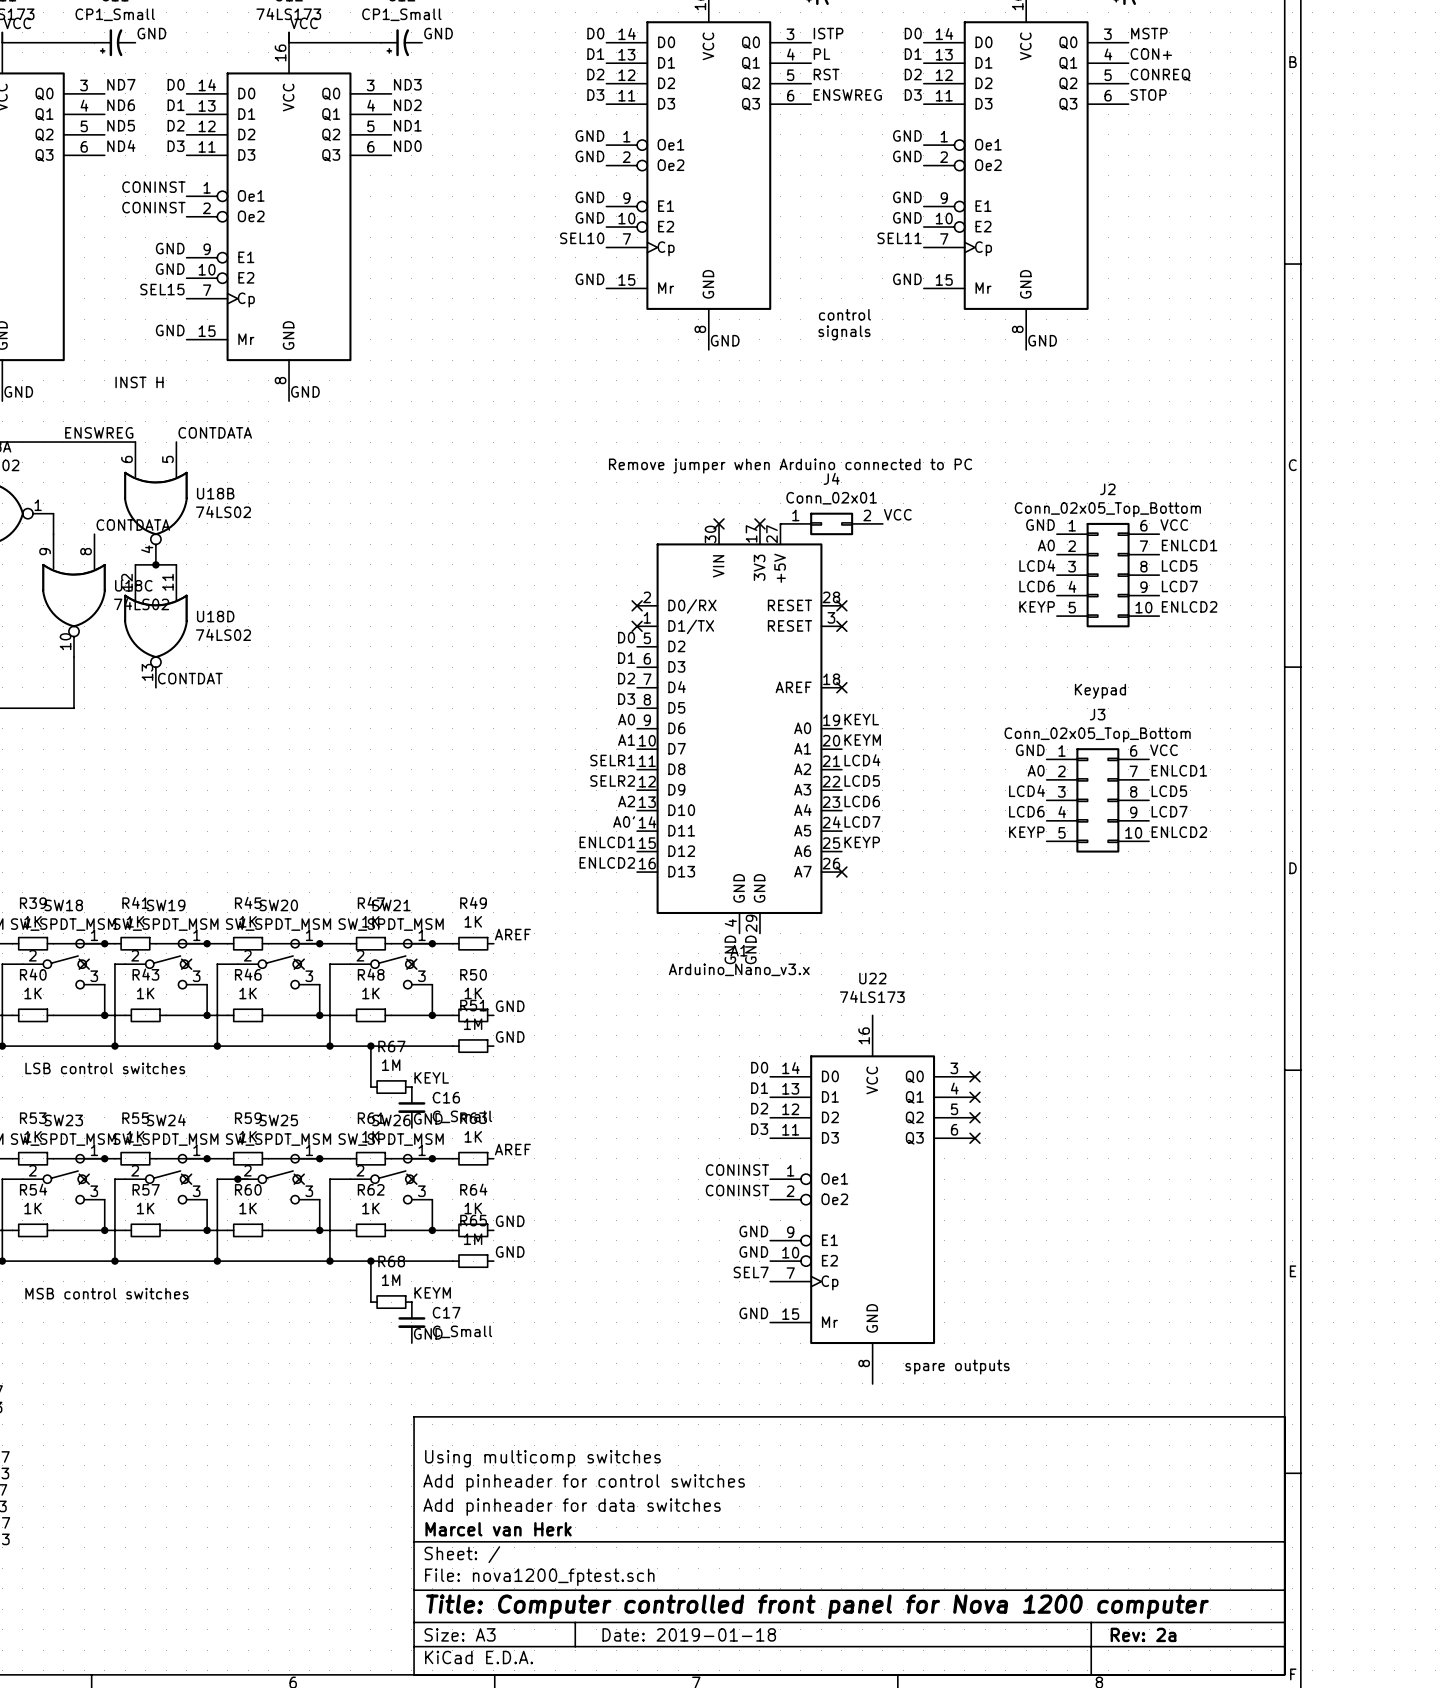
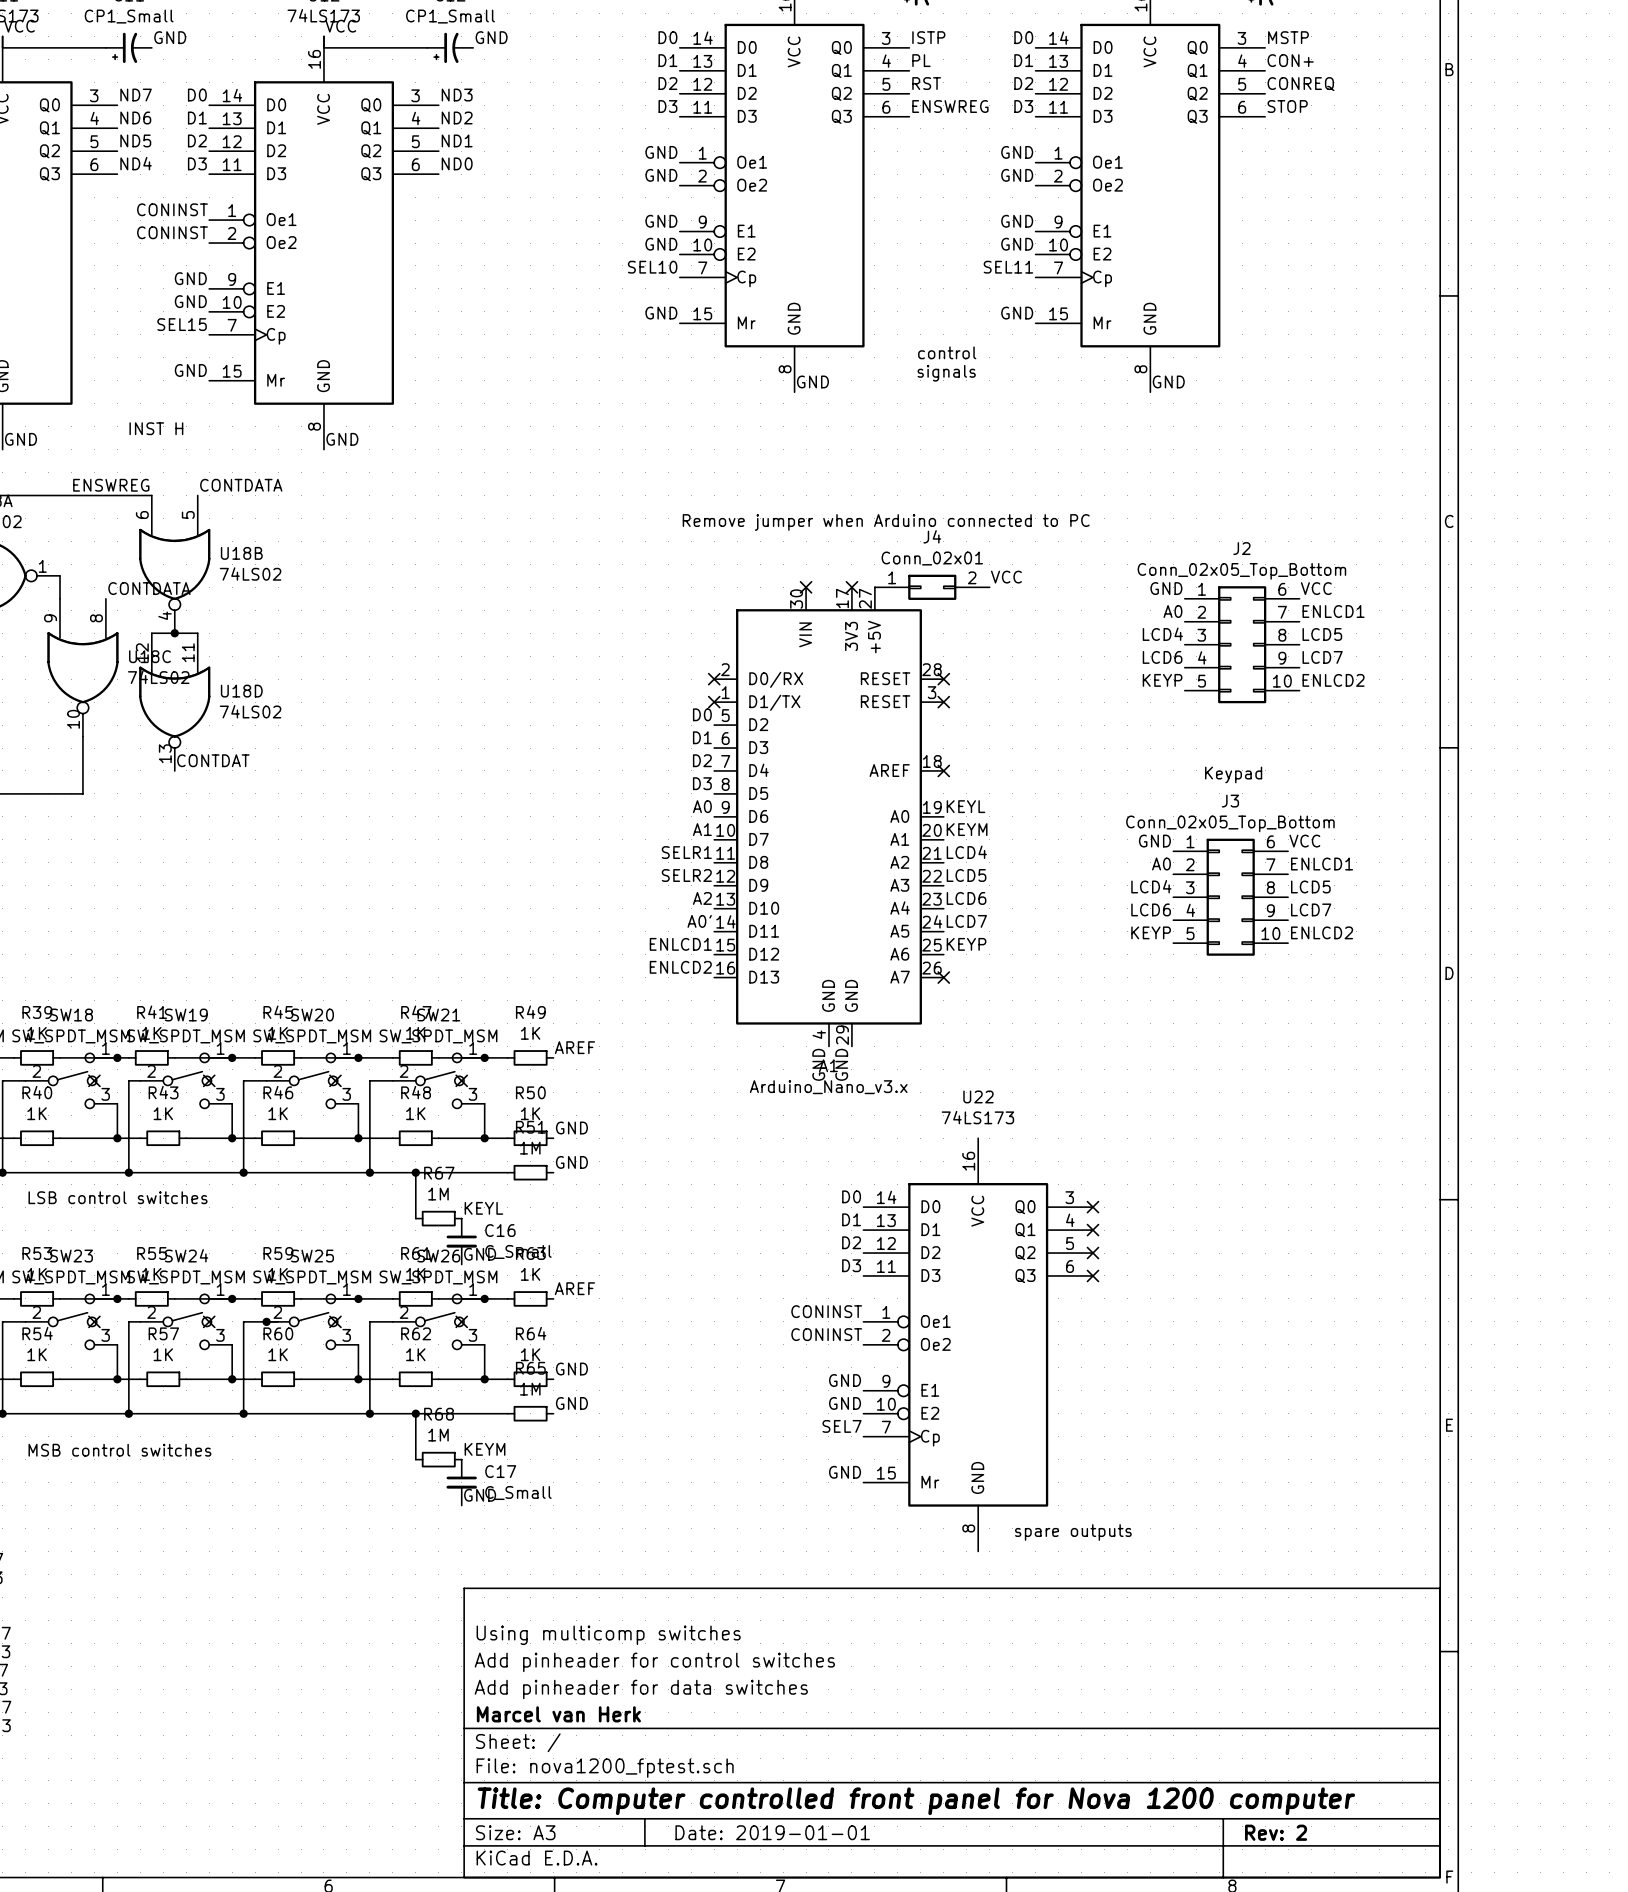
title block: Date: 2019-01-18 (689, 1634) -> Date: 2019-01-01 (772, 1832)
title block: Rev: 2a (1143, 1634) -> Rev: 2 (1276, 1832)

